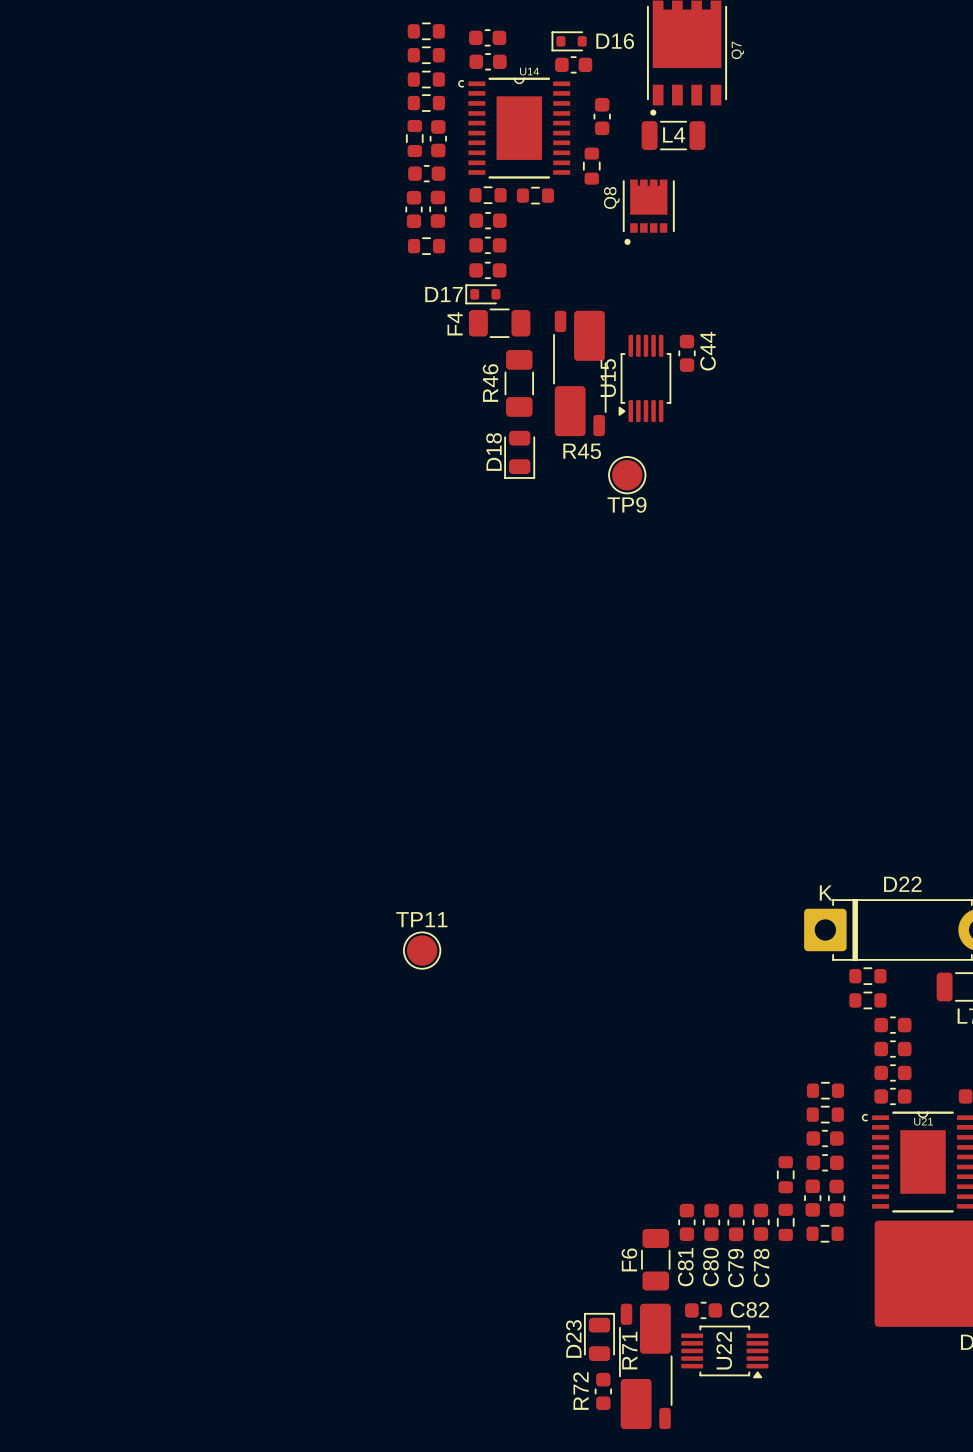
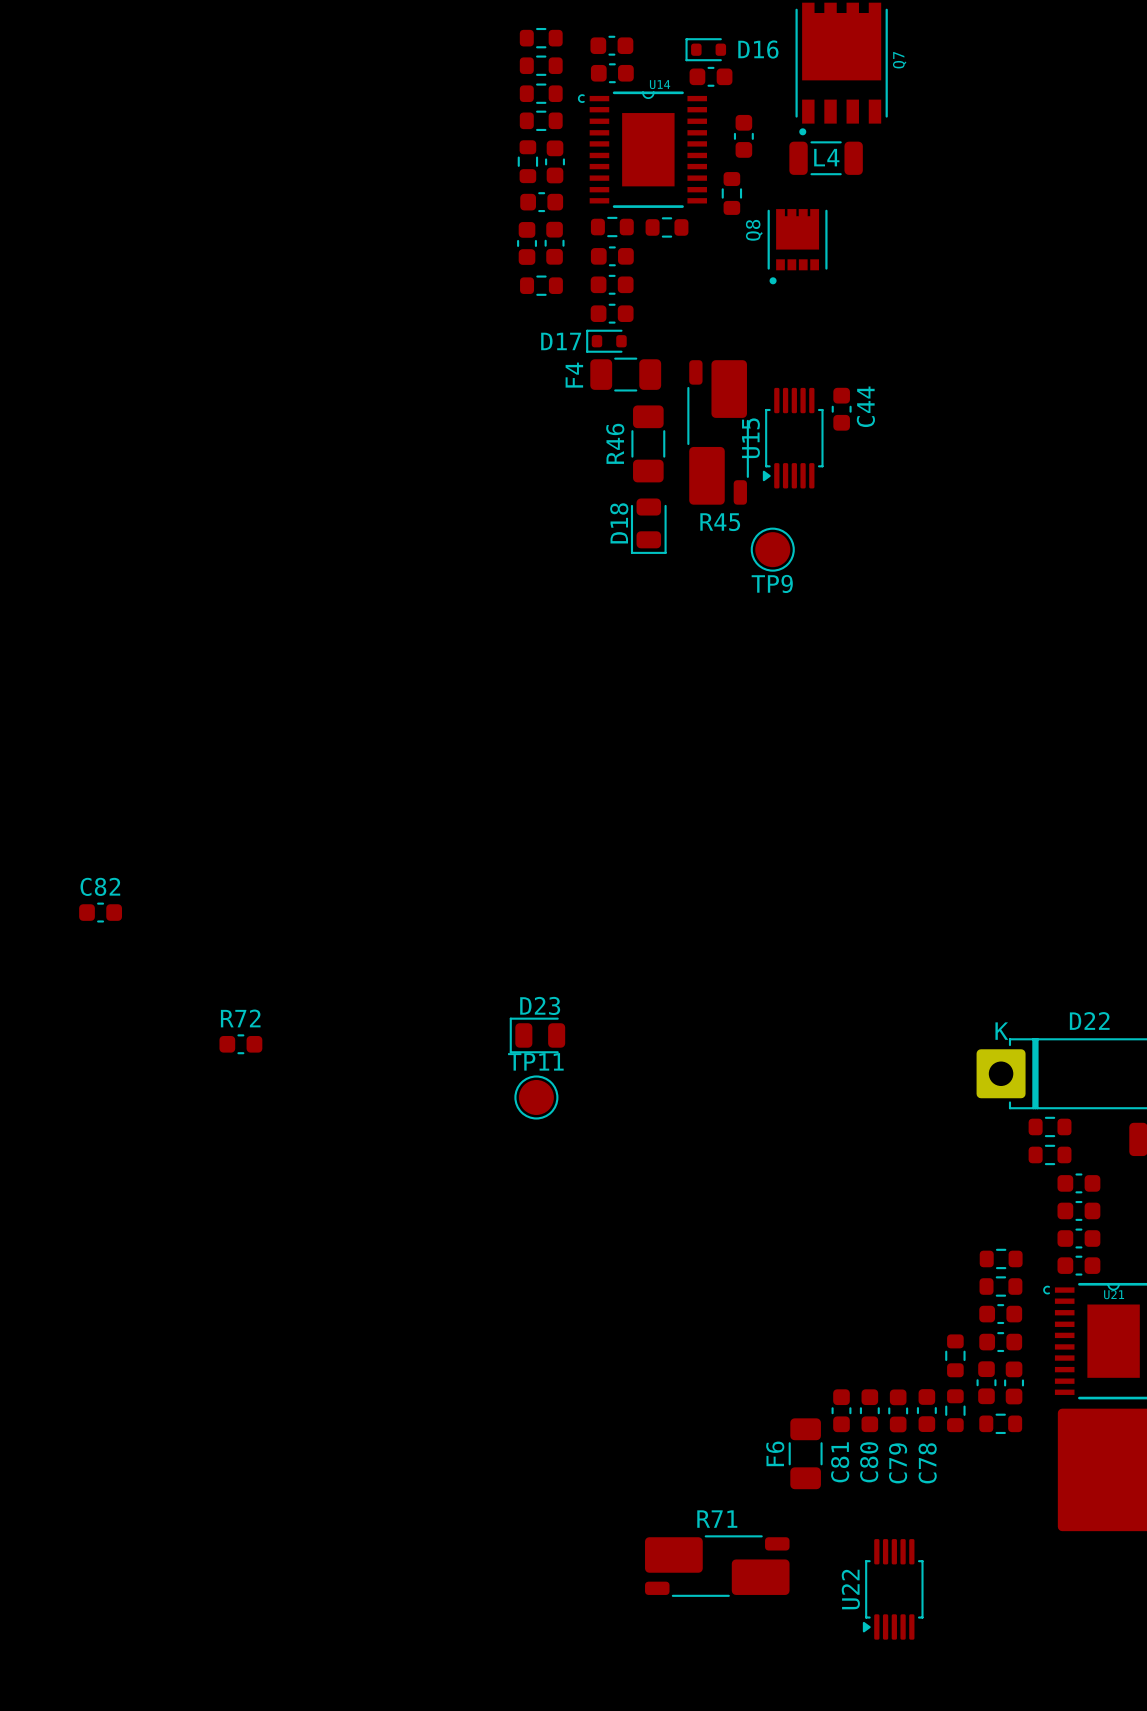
C82 name position: C82 (749, 1309) -> C82 (100, 886)
C82 position: (703, 1310) -> (100, 912)
D23 rotation: 0° (599, 1336) -> 90° counterclockwise (537, 1035)
D23 position: (599, 1336) -> (537, 1035)
D23 name position: D23 (573, 1338) -> D23 (540, 1005)
U22 name position: U22 (724, 1350) -> U22 (850, 1589)
U22 rotation: 0° (724, 1351) -> 90° clockwise (893, 1589)
R71 rotation: 0° (645, 1366) -> 90° clockwise (717, 1566)
R72 rotation: 0° (603, 1391) -> 90° clockwise (240, 1044)
R72 position: (603, 1391) -> (240, 1044)

